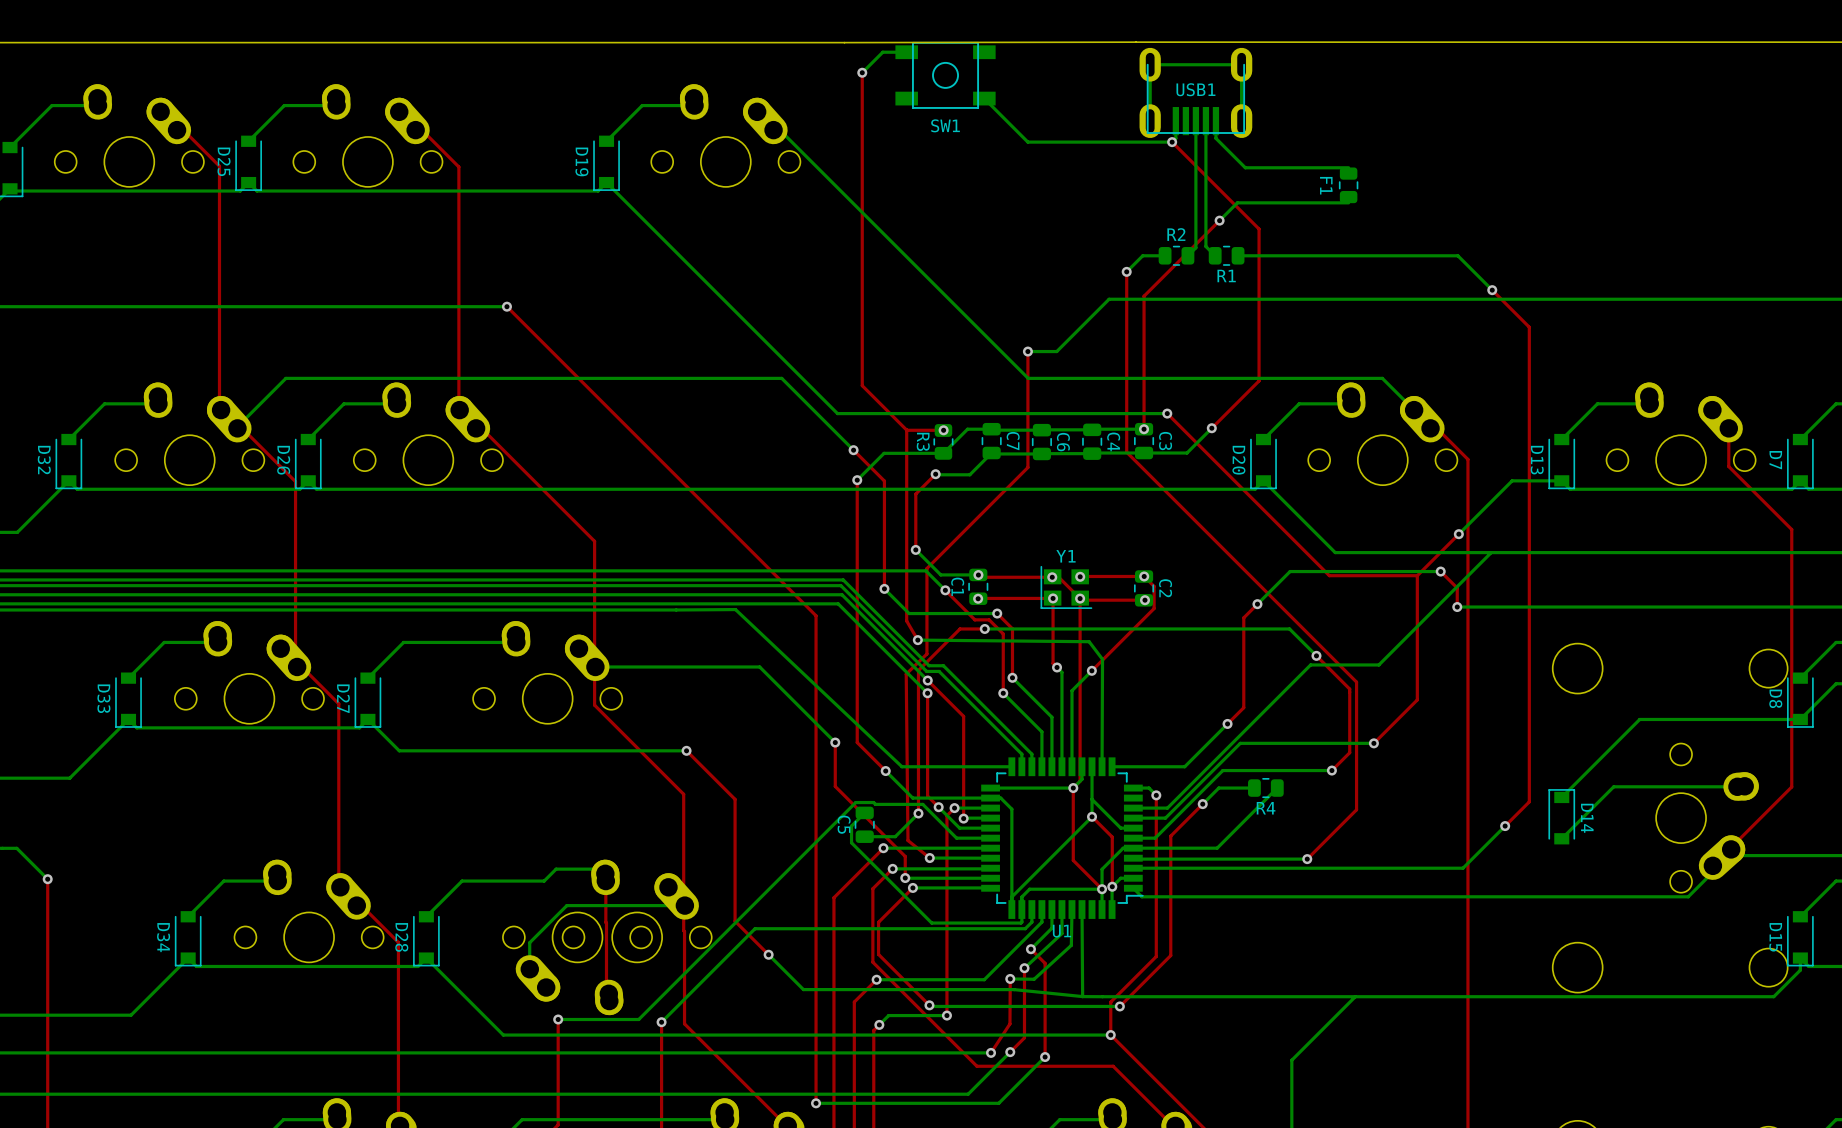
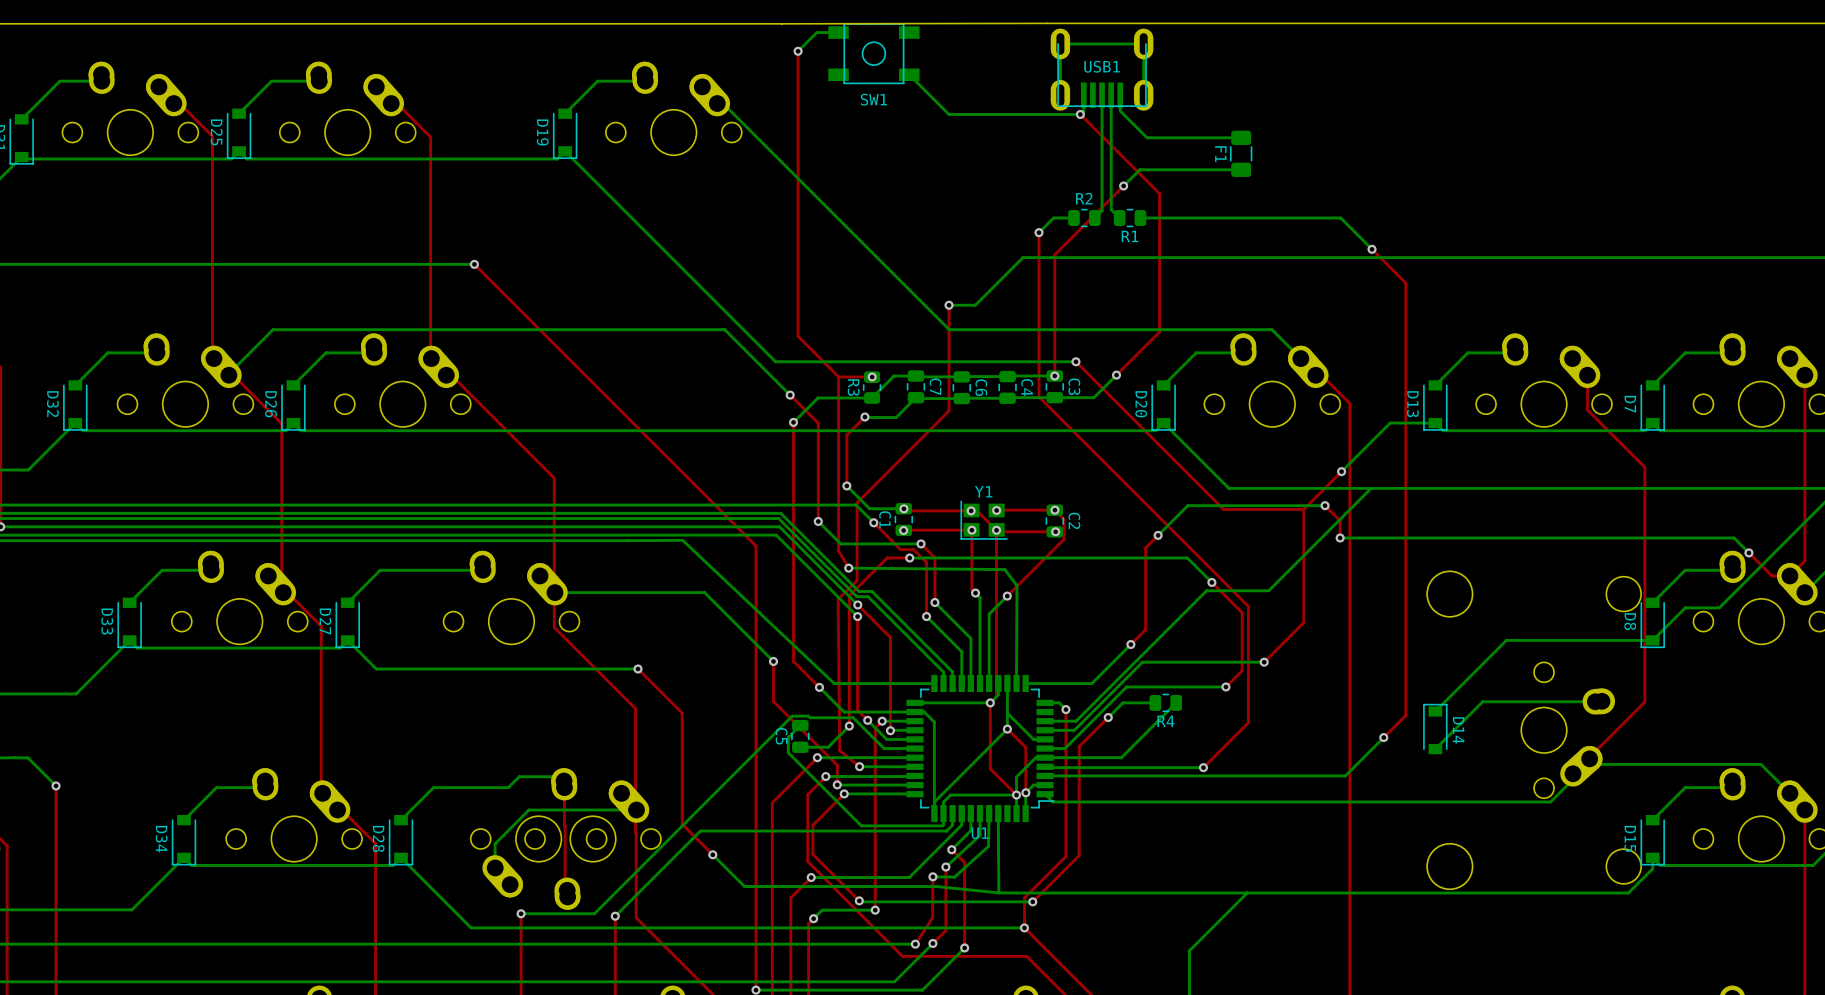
F1 footprint: [1338, 167, 1359, 204] -> [1230, 130, 1253, 177]

